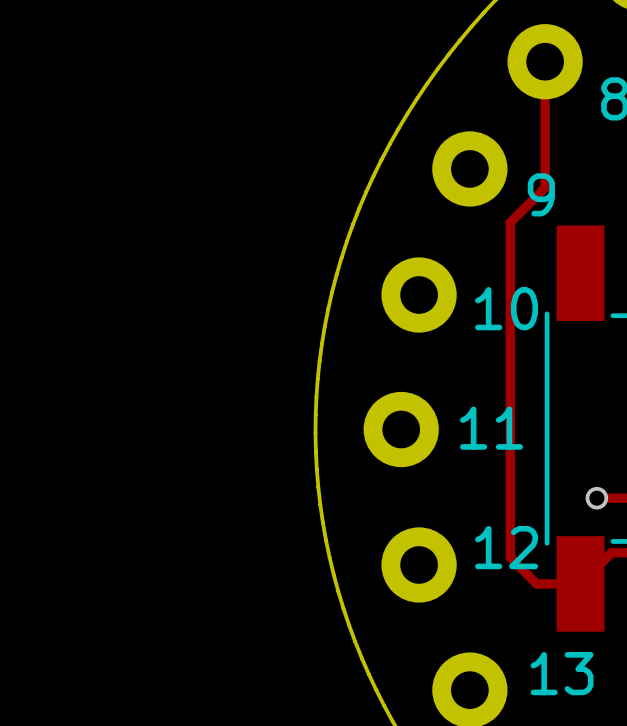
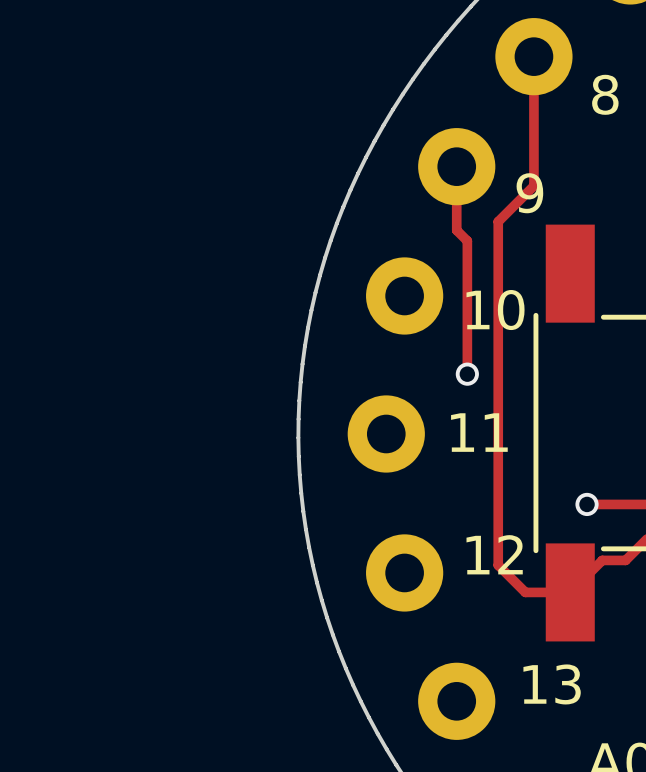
track: none -> (456, 166) (456, 230) (467, 240) (467, 374)
via: none -> (467, 374)

